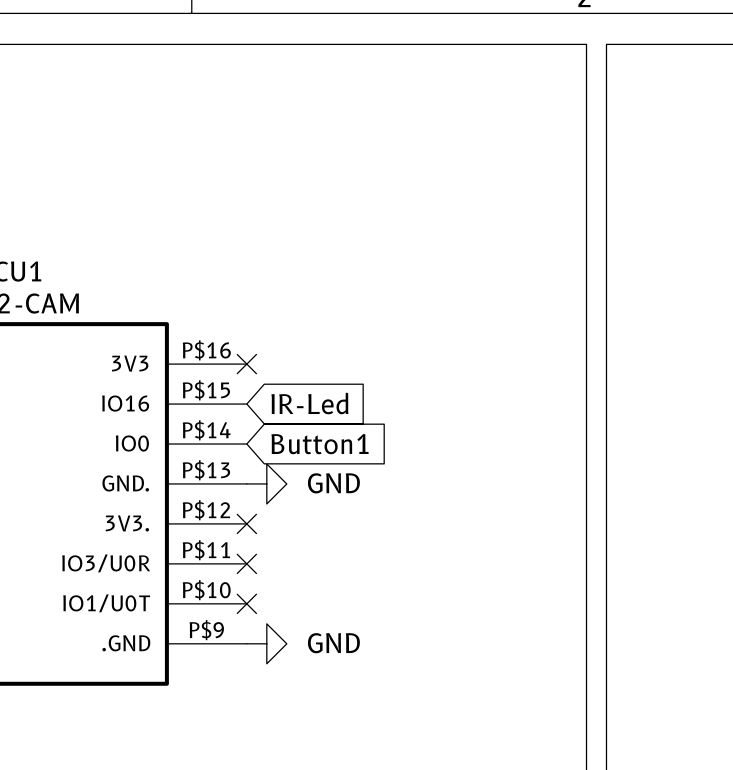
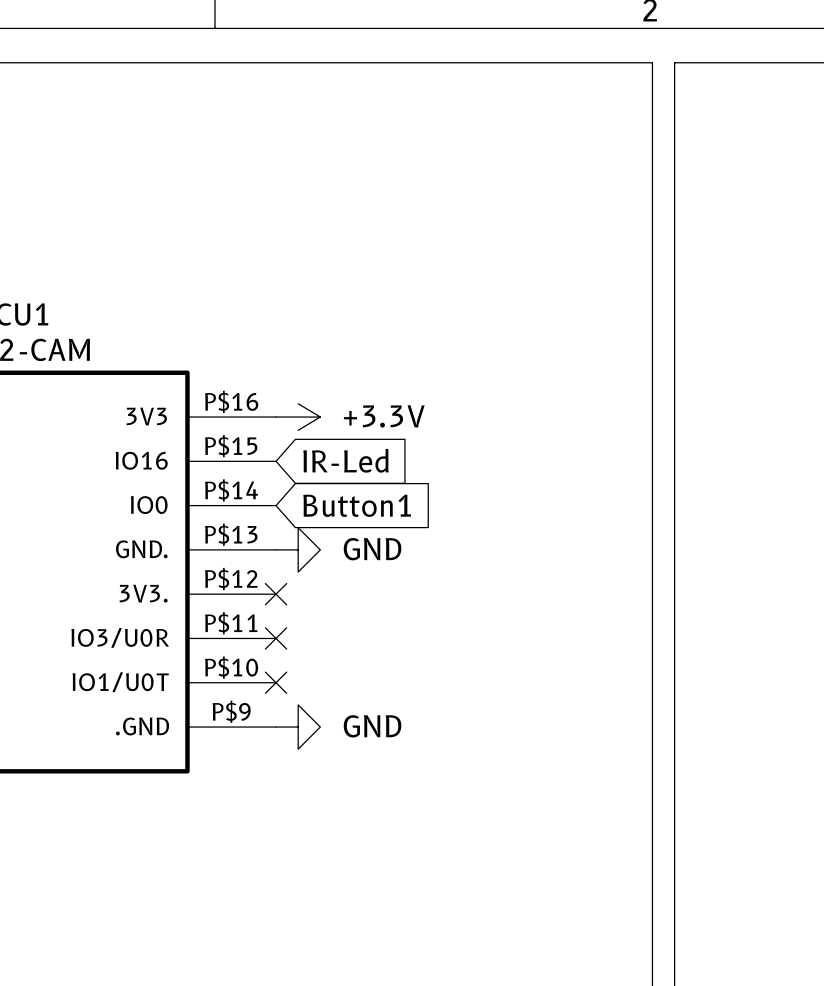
no-connect mark: (246, 364) -> none
power symbol: none -> +3.3V (298, 417)

